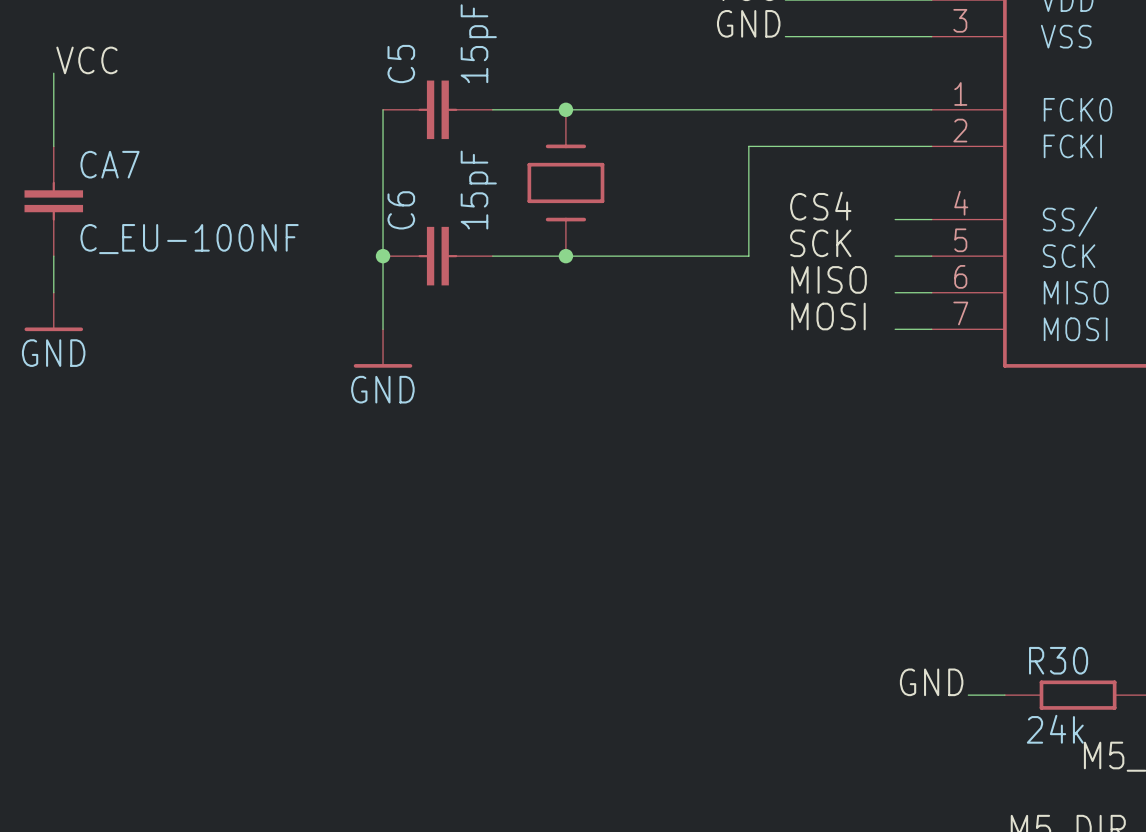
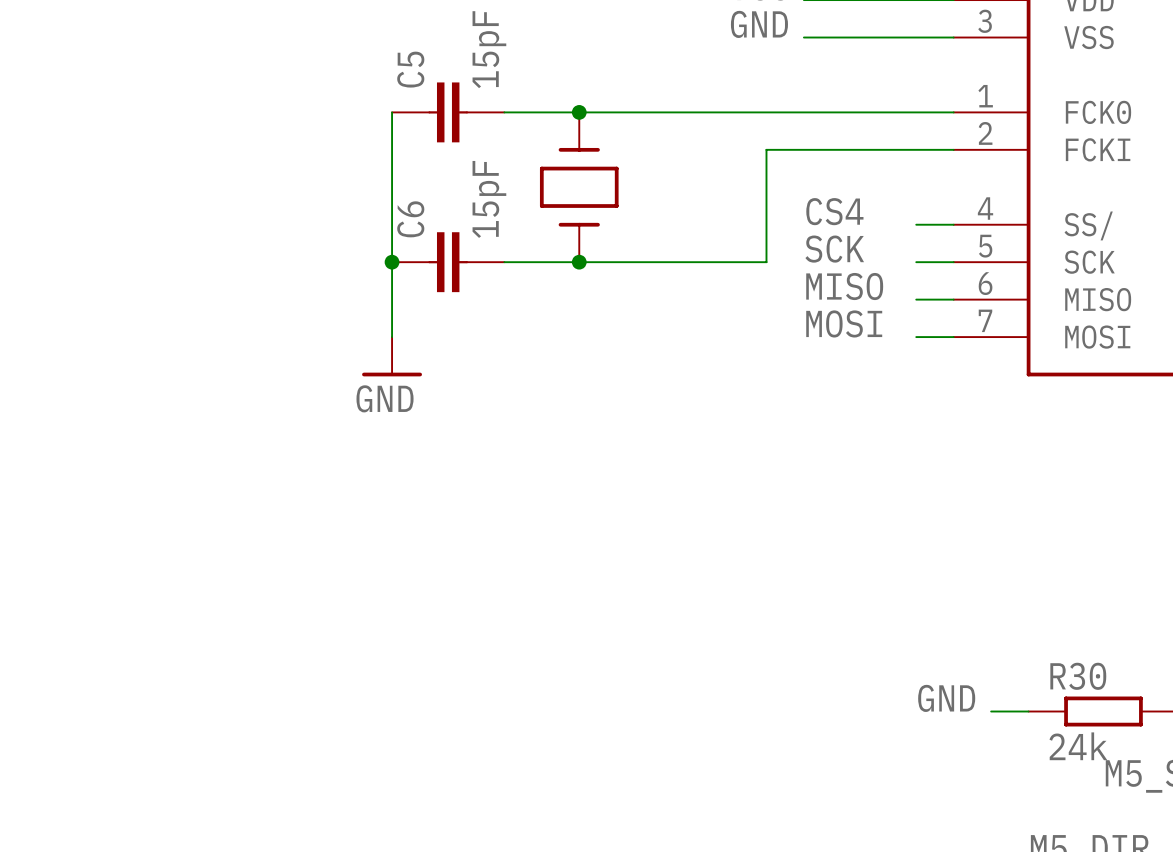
label: VCC (86, 60) -> none
wire: (53, 73) (53, 146) -> none
CA7: C_EU-100NF (53, 201) -> none
wire: (53, 256) (53, 292) -> none
power symbol: GND (53, 311) -> none

